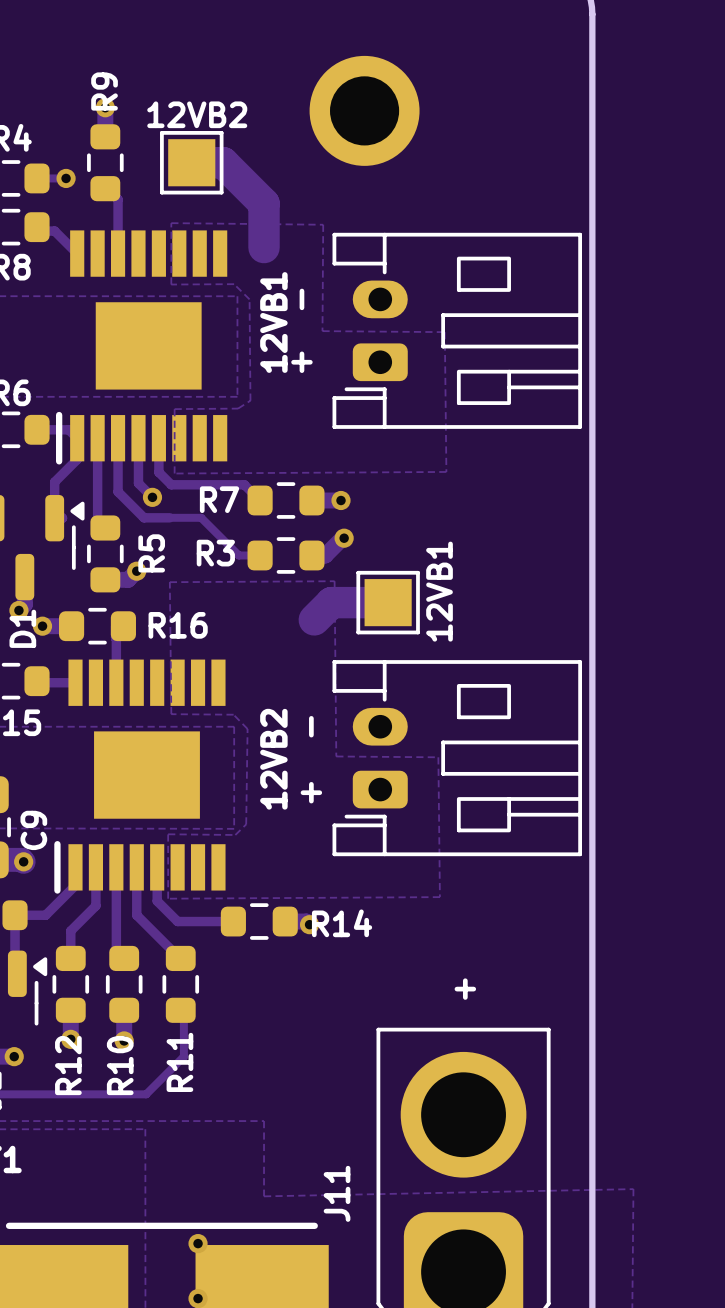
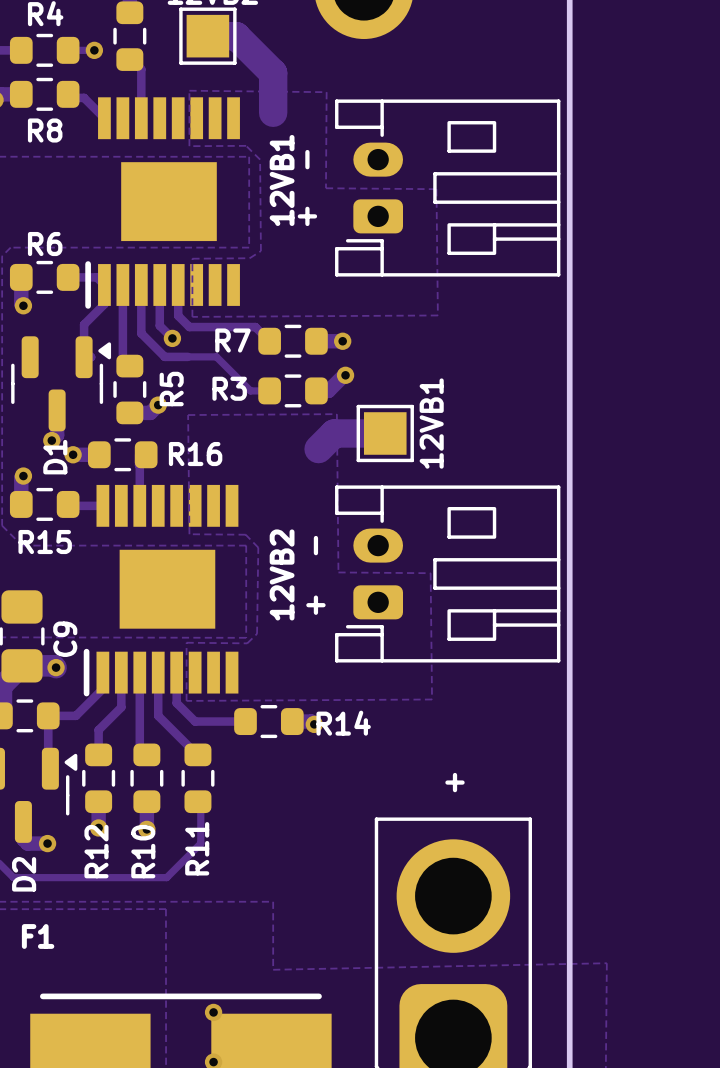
J11 name: J11 (337, 1193) -> none

